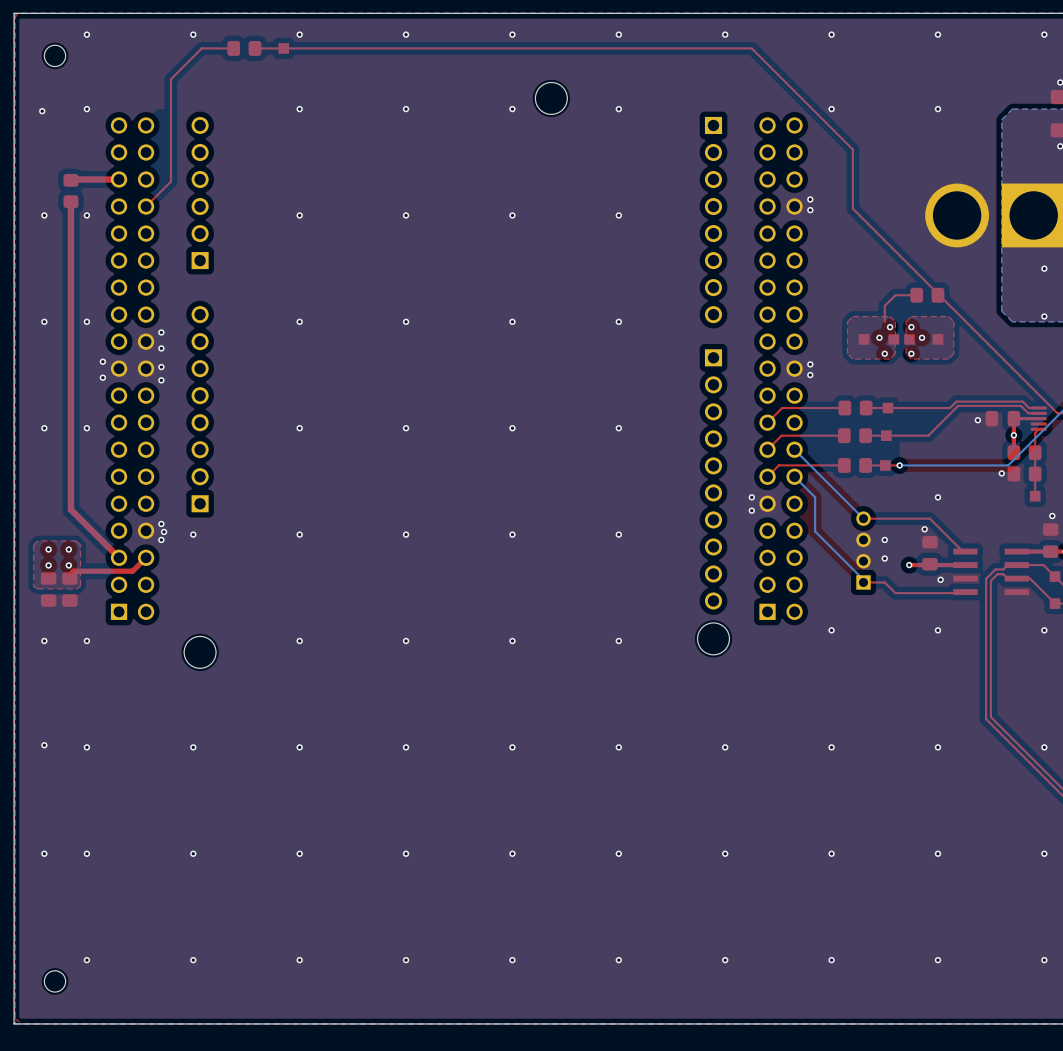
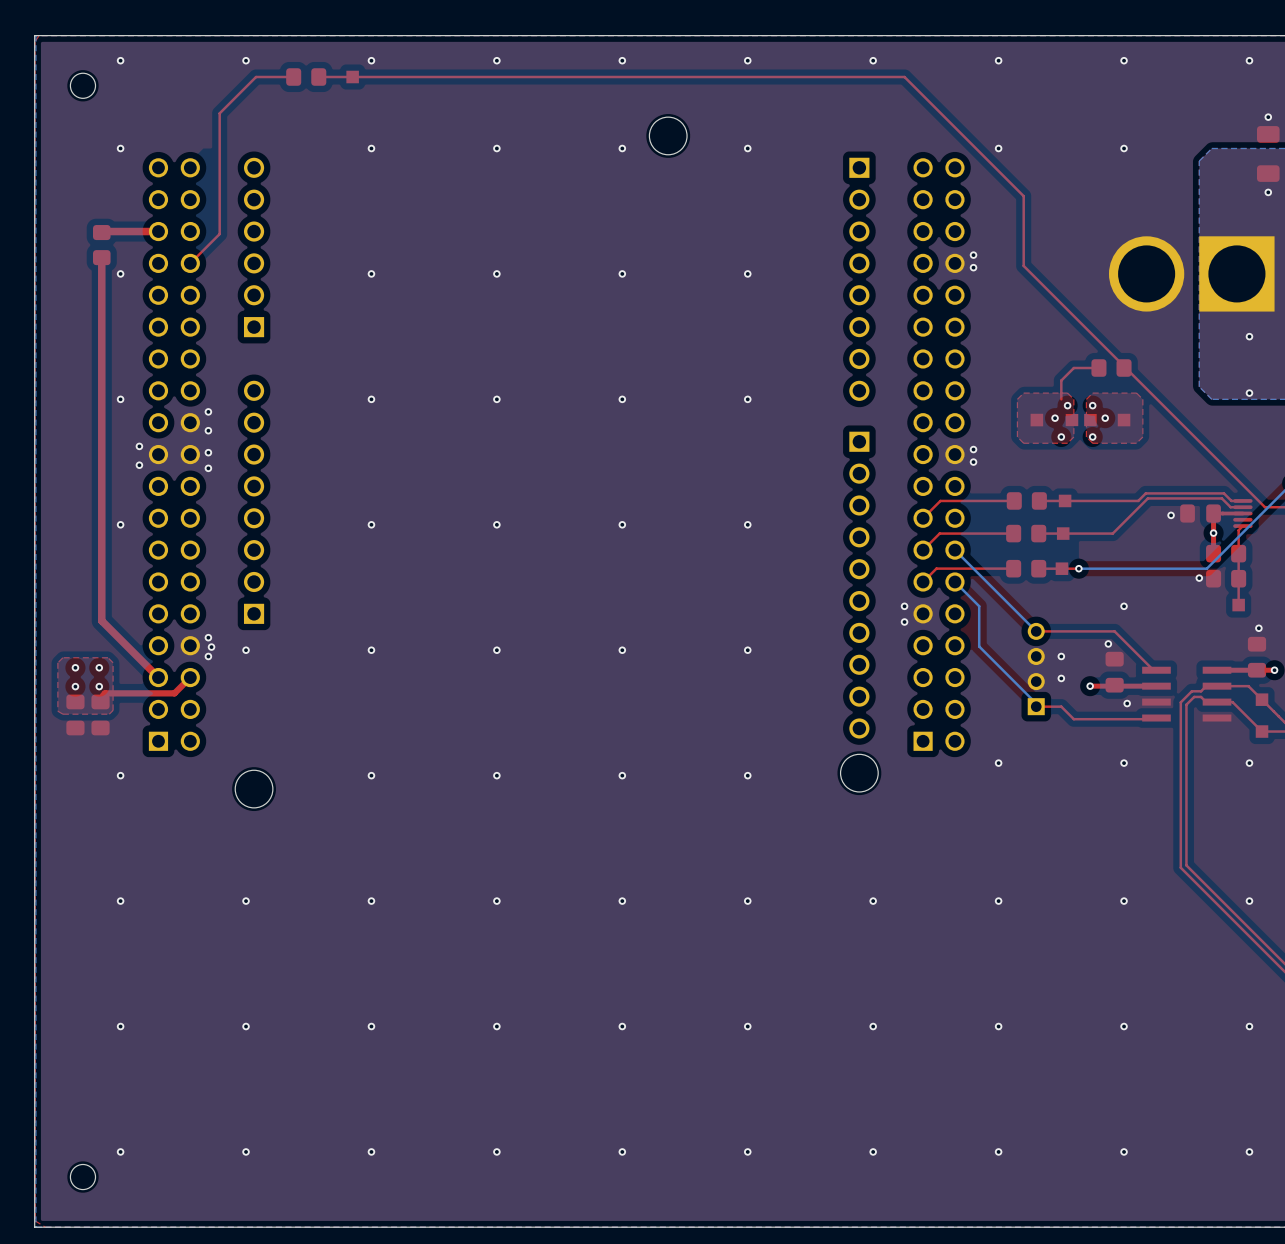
via: (42, 111) -> none
via: (44, 215) -> none
via: (44, 321) -> none
via: (44, 428) -> none
via: (44, 640) -> none
via: (44, 745) -> none
via: (44, 853) -> none

